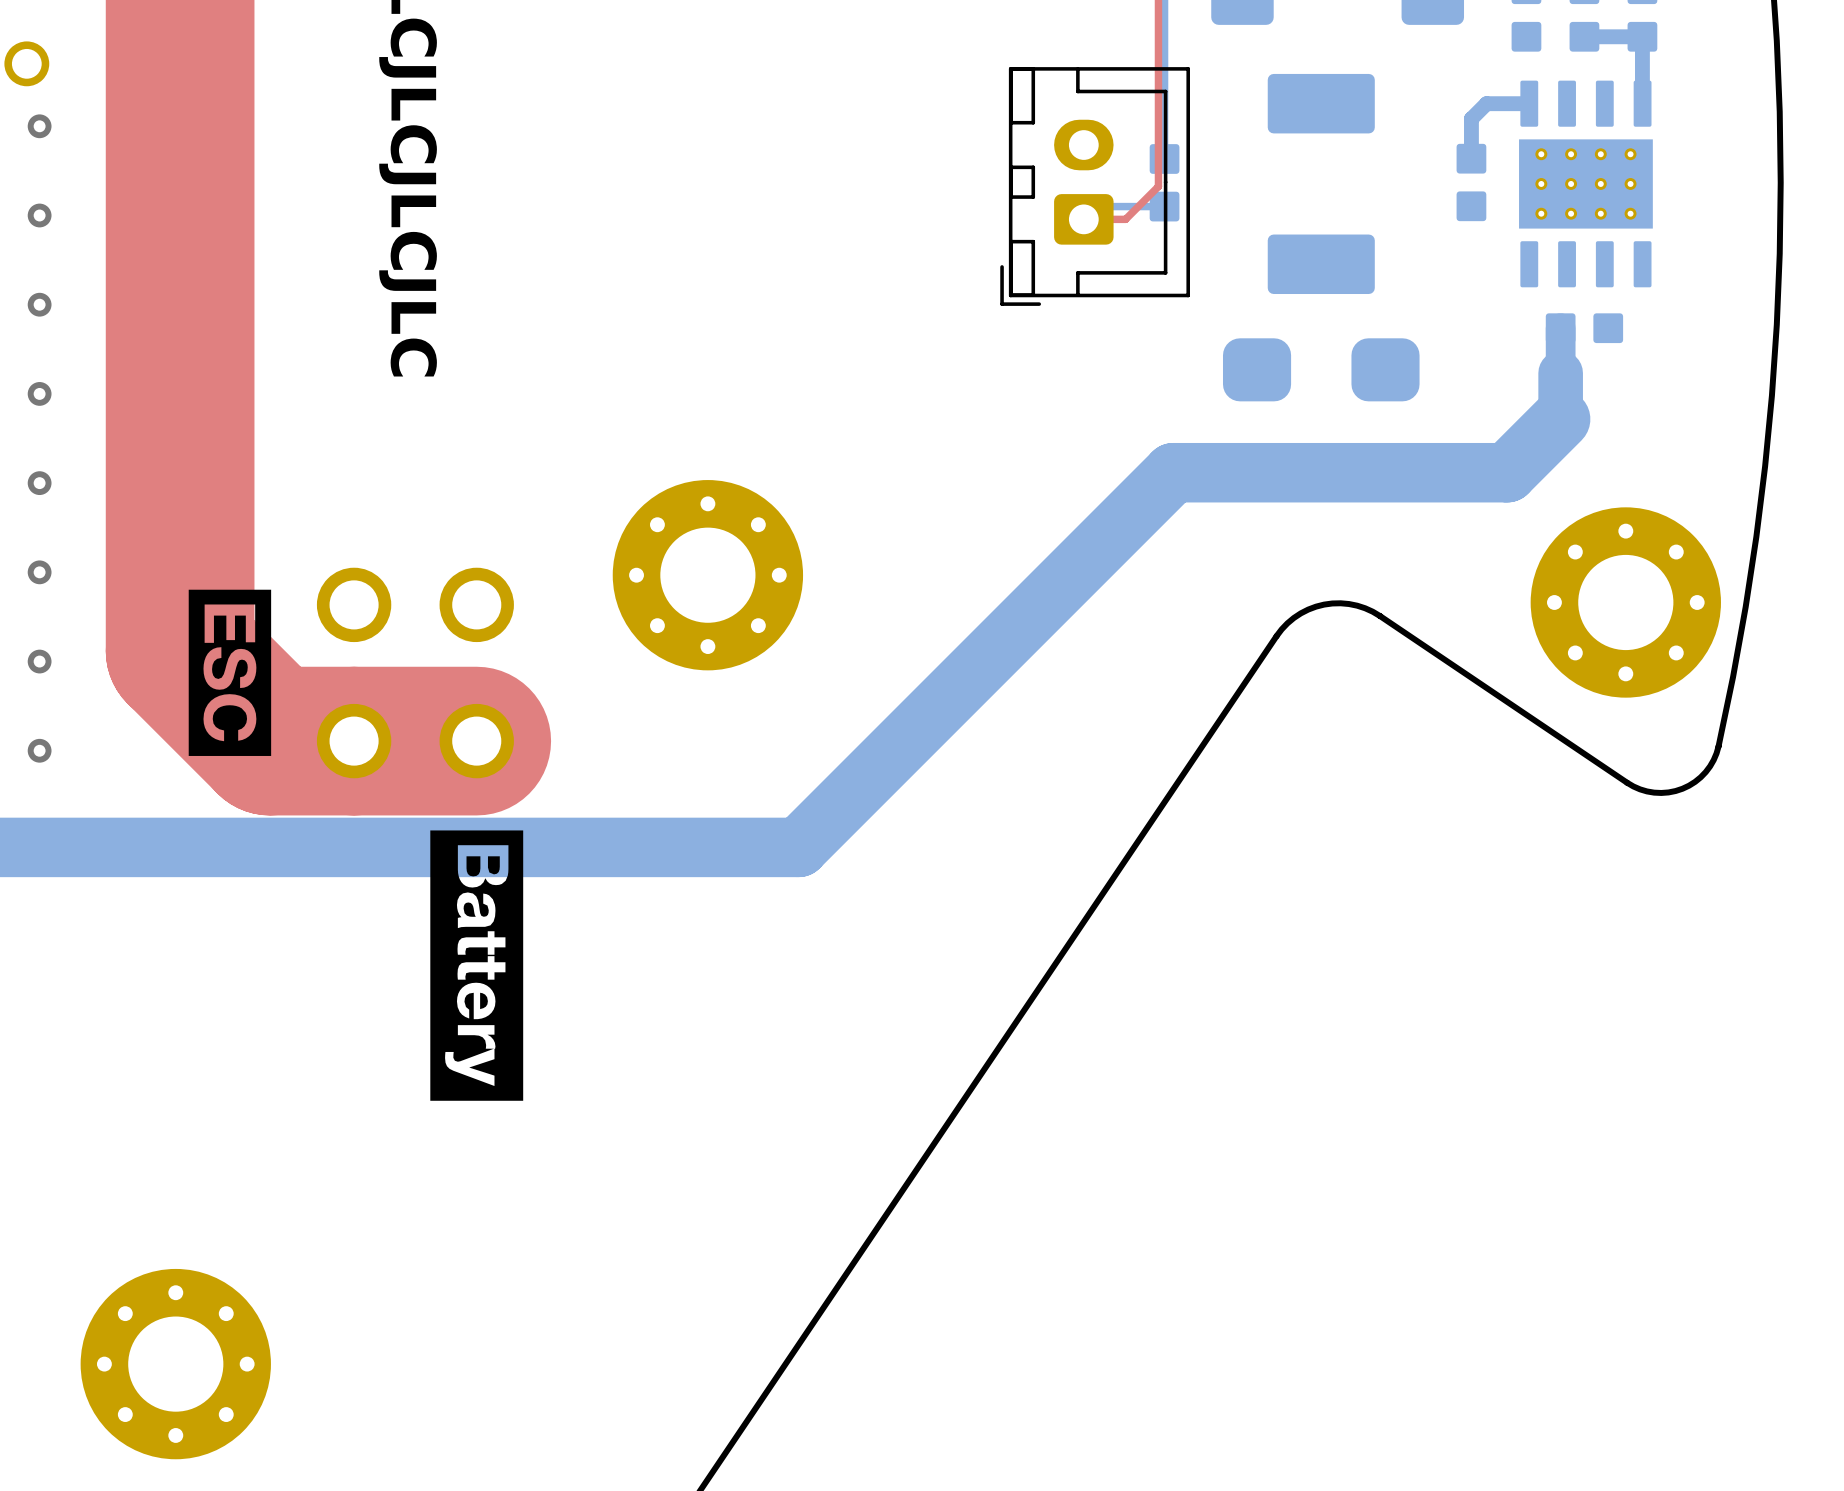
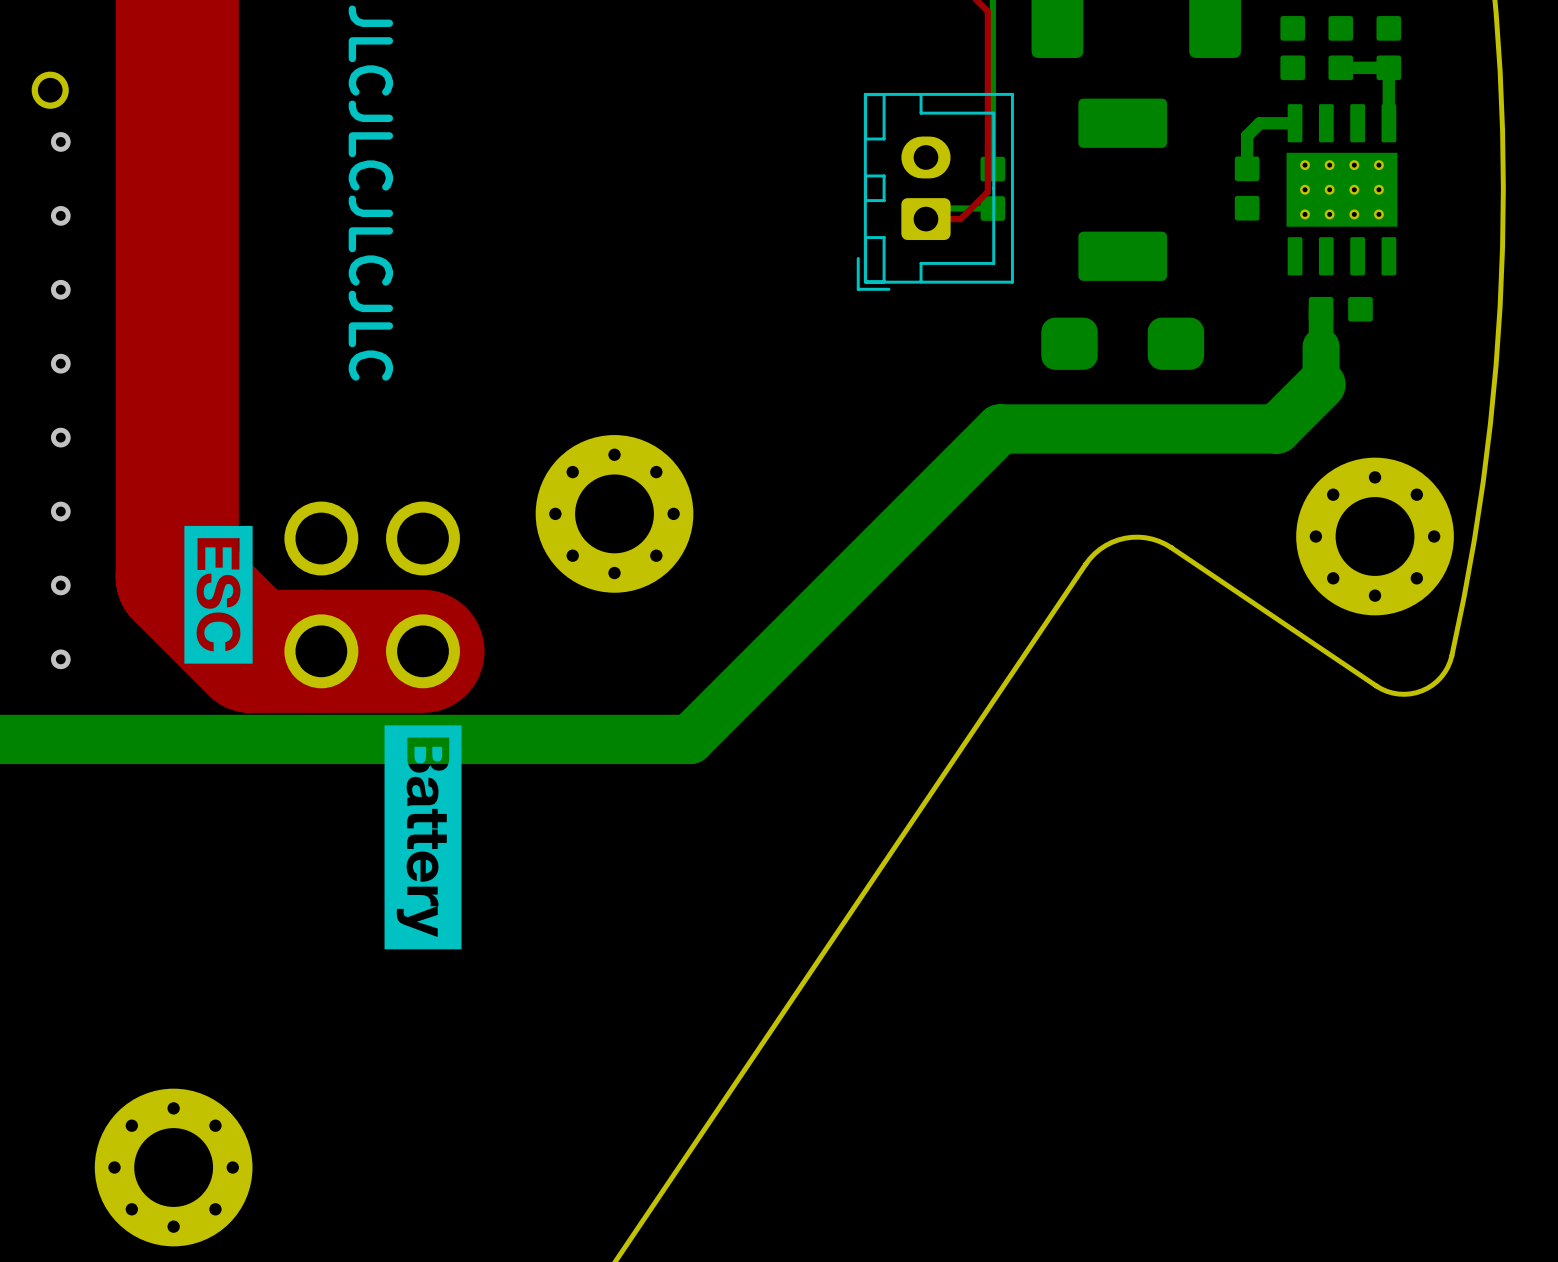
part footprint: [316, 567, 392, 779] -> [284, 501, 359, 689]
part footprint: [439, 567, 514, 779] -> [386, 501, 460, 689]

